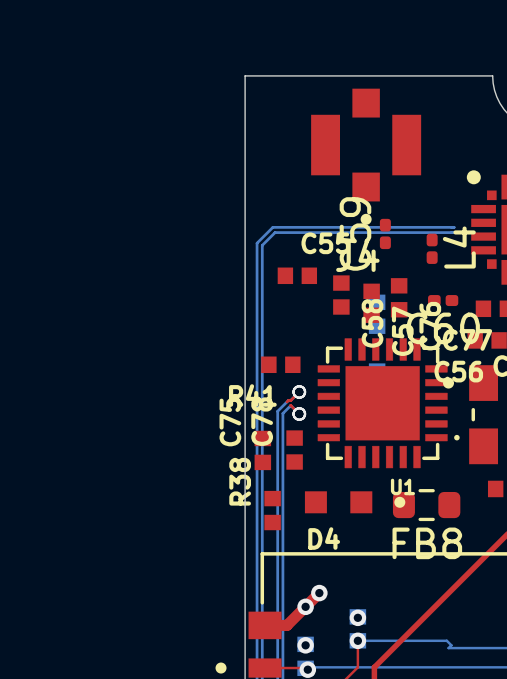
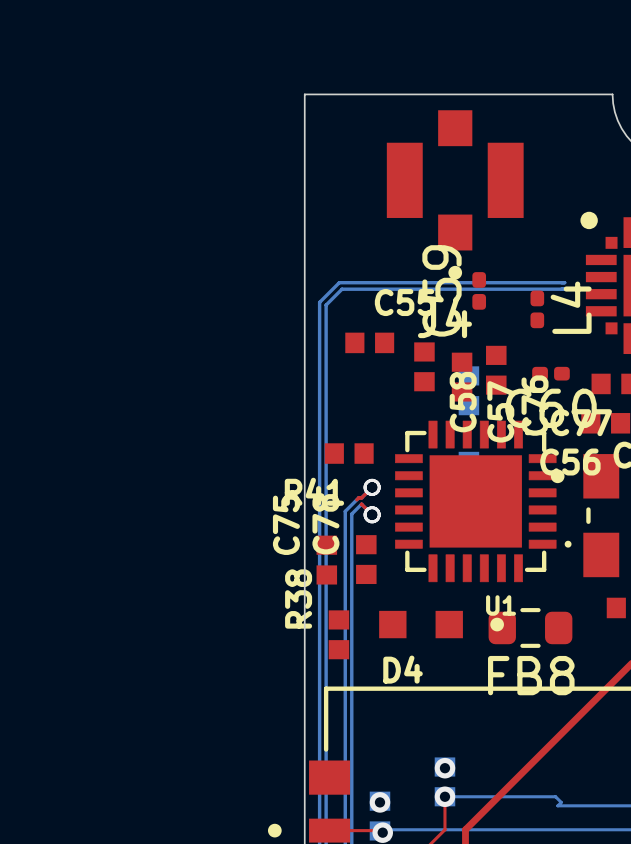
top track: (319, 593) (287, 625) (265, 625) -> none
via: (319, 593) -> none
via: (305, 606) -> none

